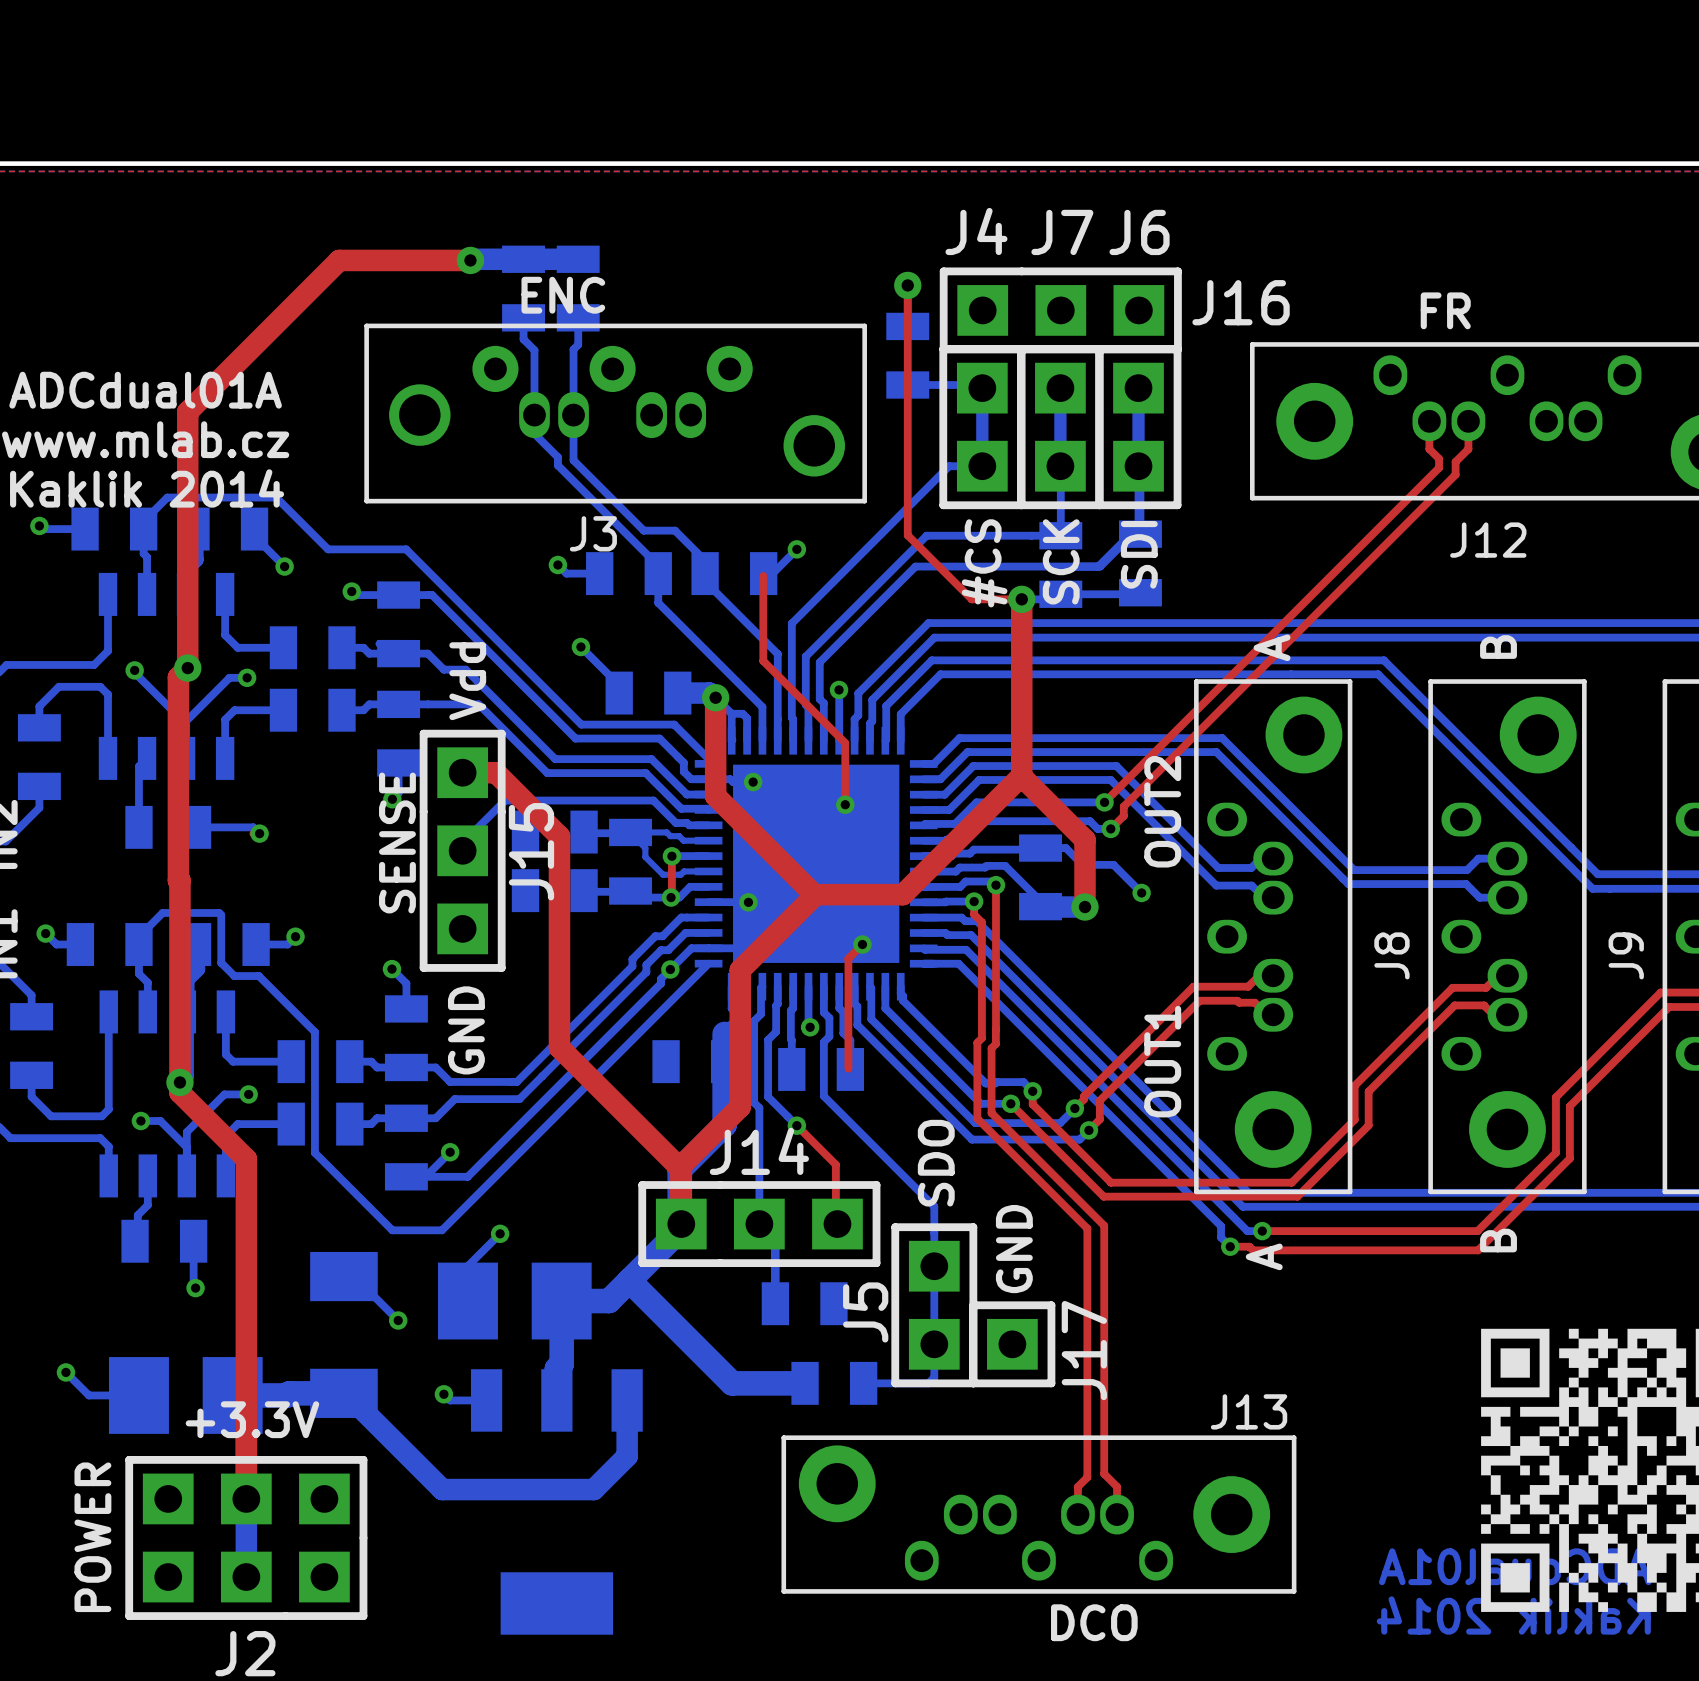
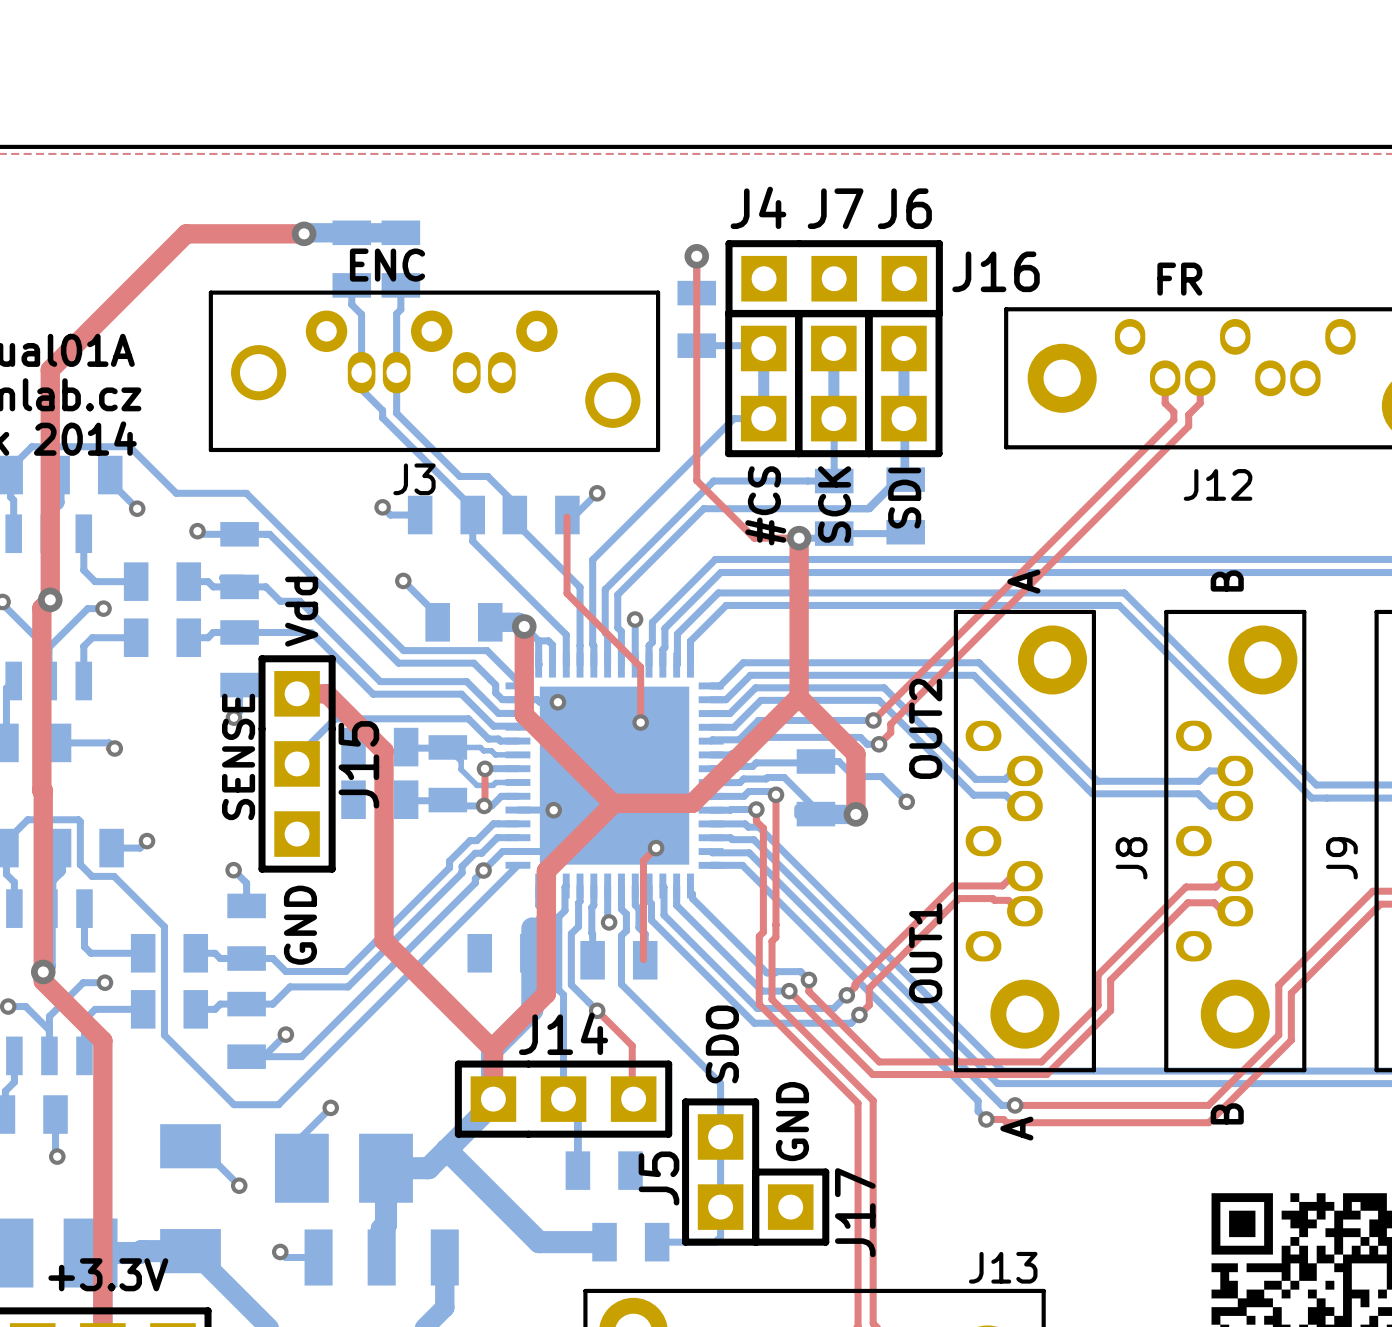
bottom track: none -> (797, 807) (797, 815)

